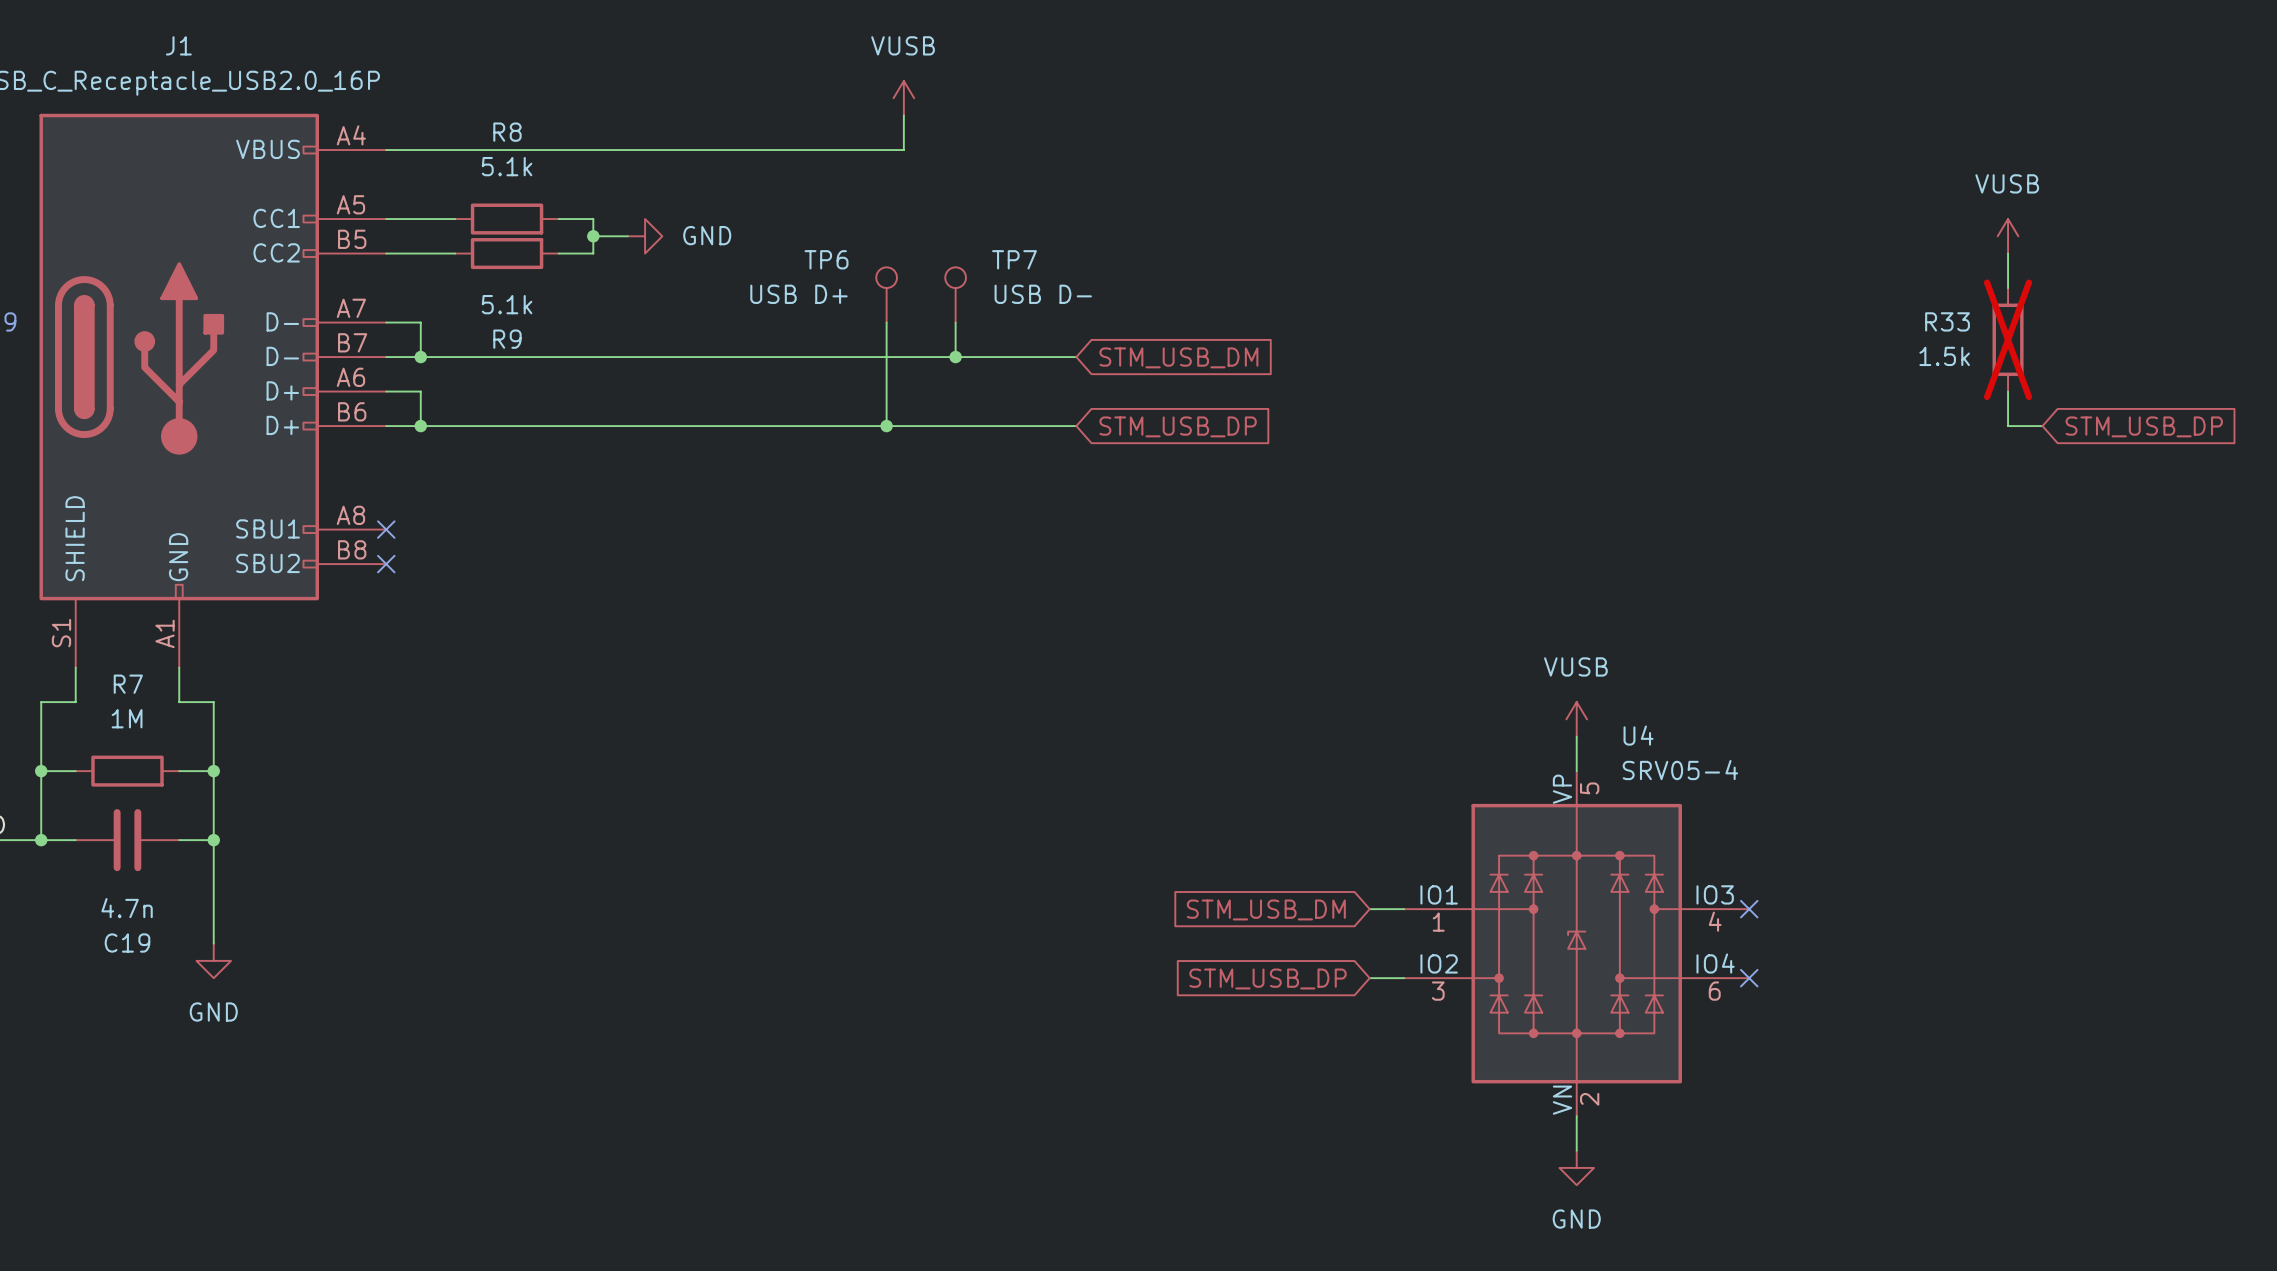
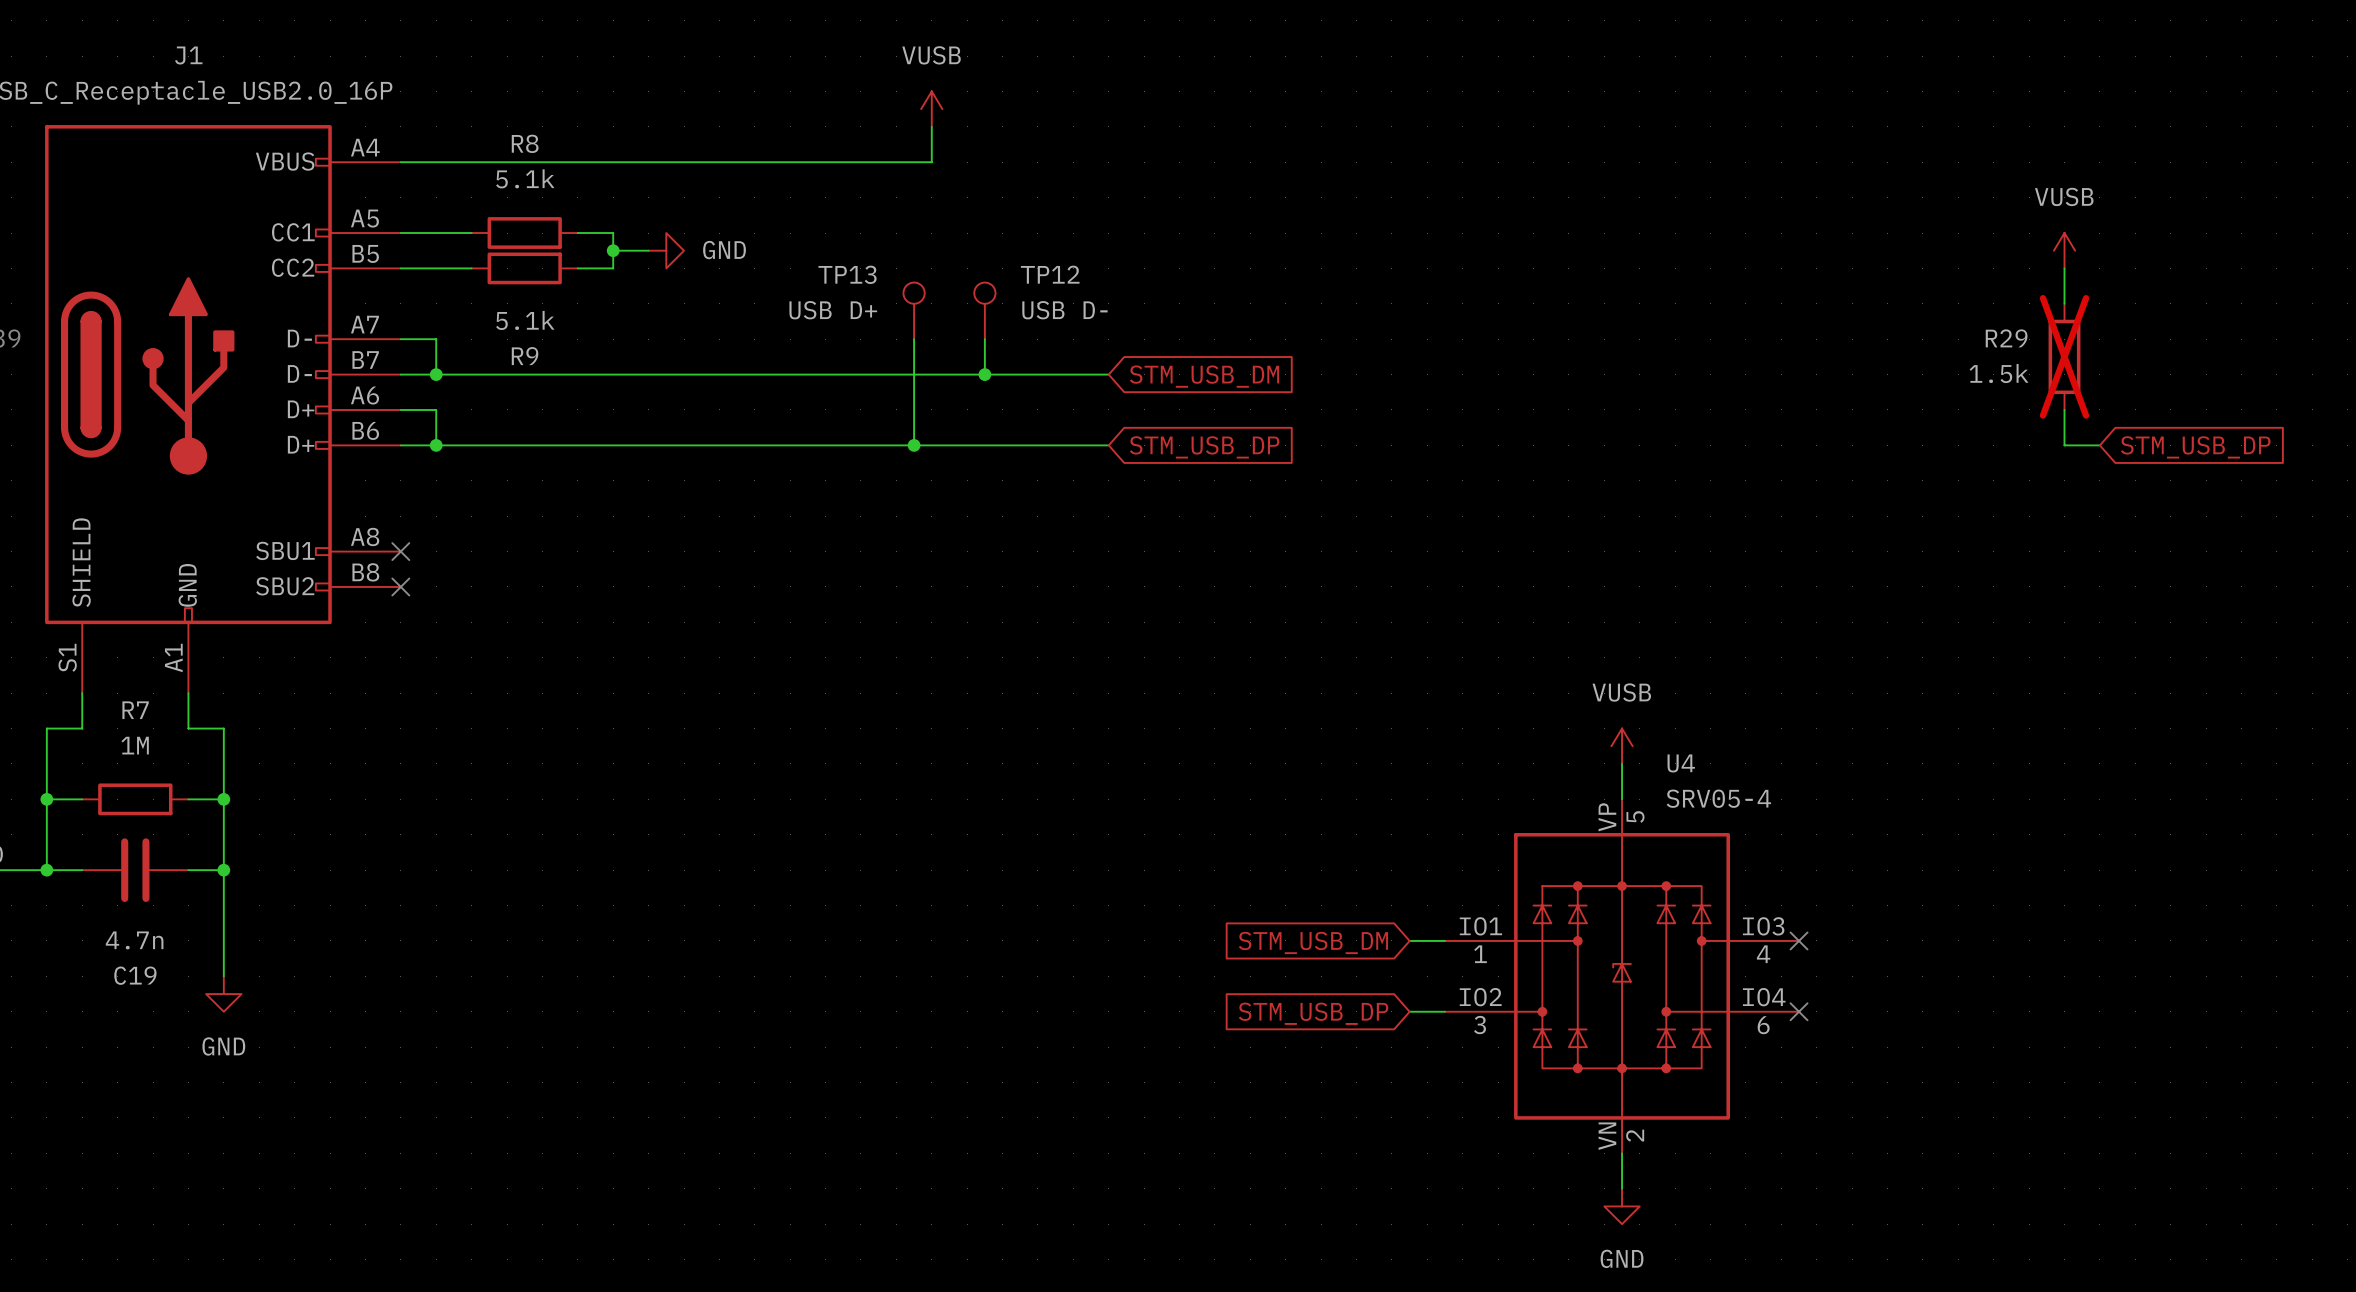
TP6 name: TP6 (826, 259) -> TP13 (847, 274)
TP7 name: TP7 (1014, 259) -> TP12 (1050, 274)
R33 name: R33 (1947, 321) -> R29 (2006, 338)

